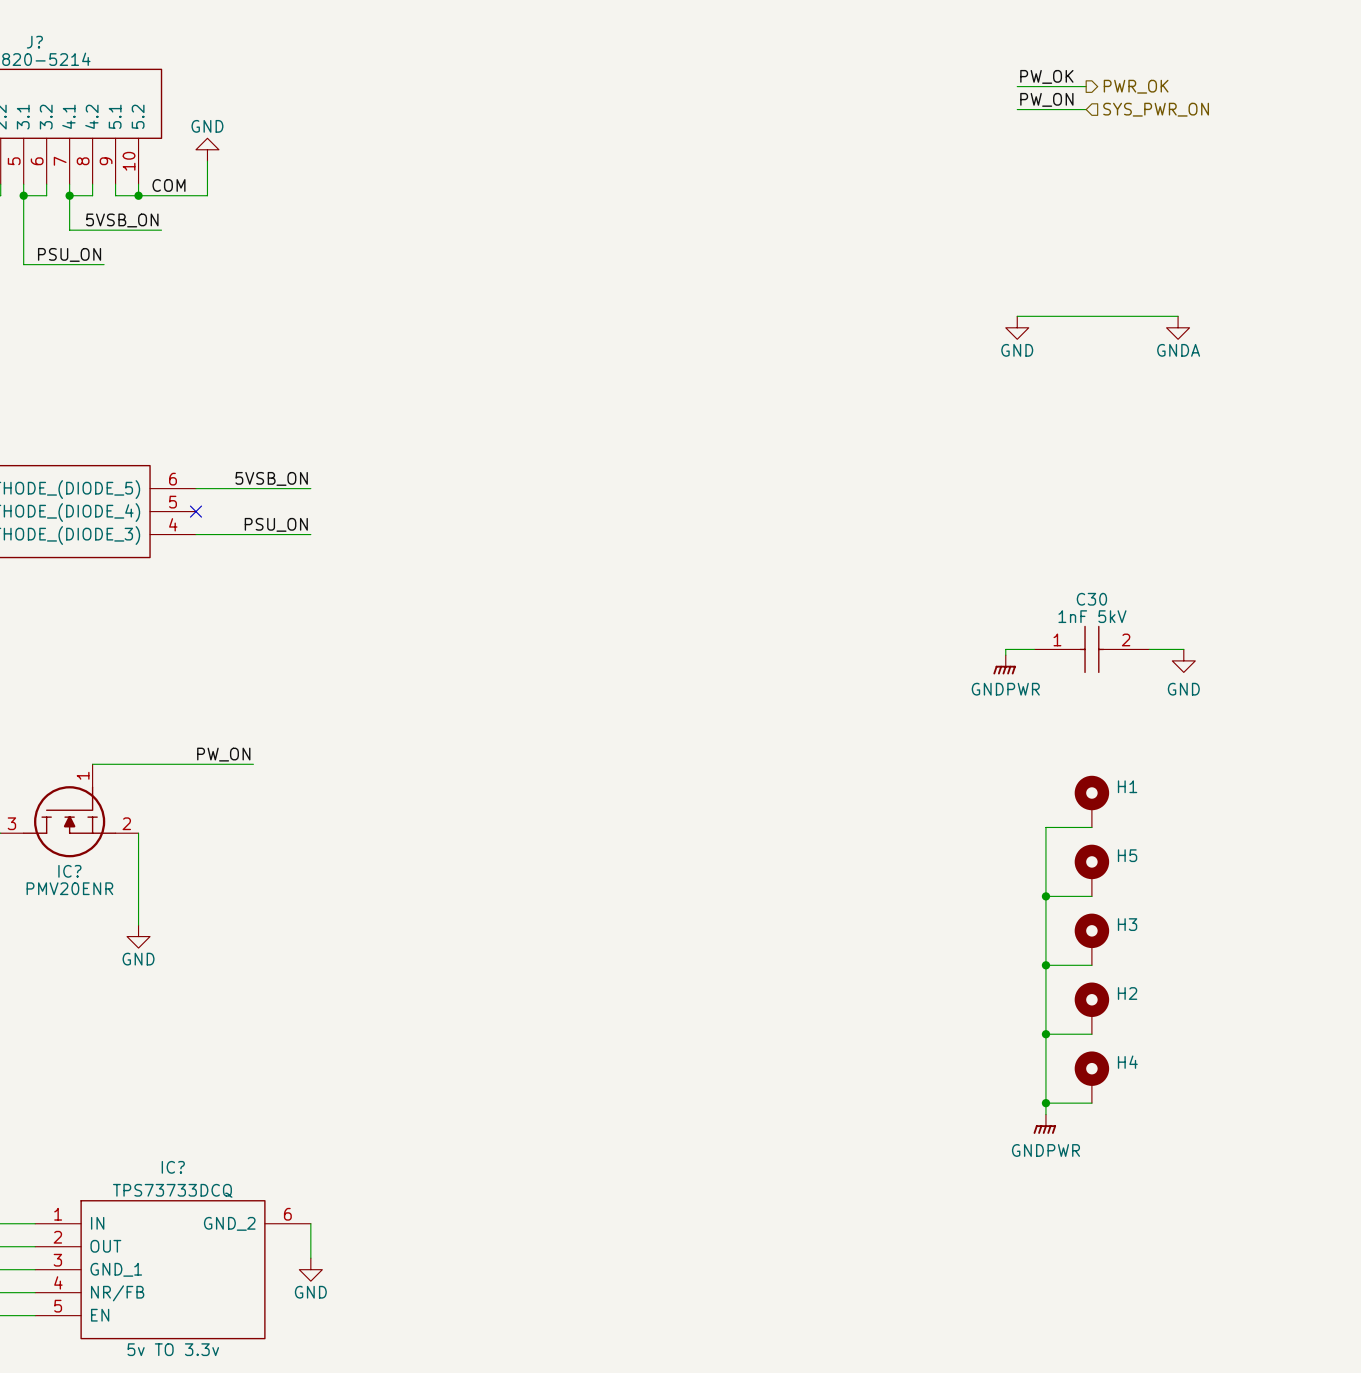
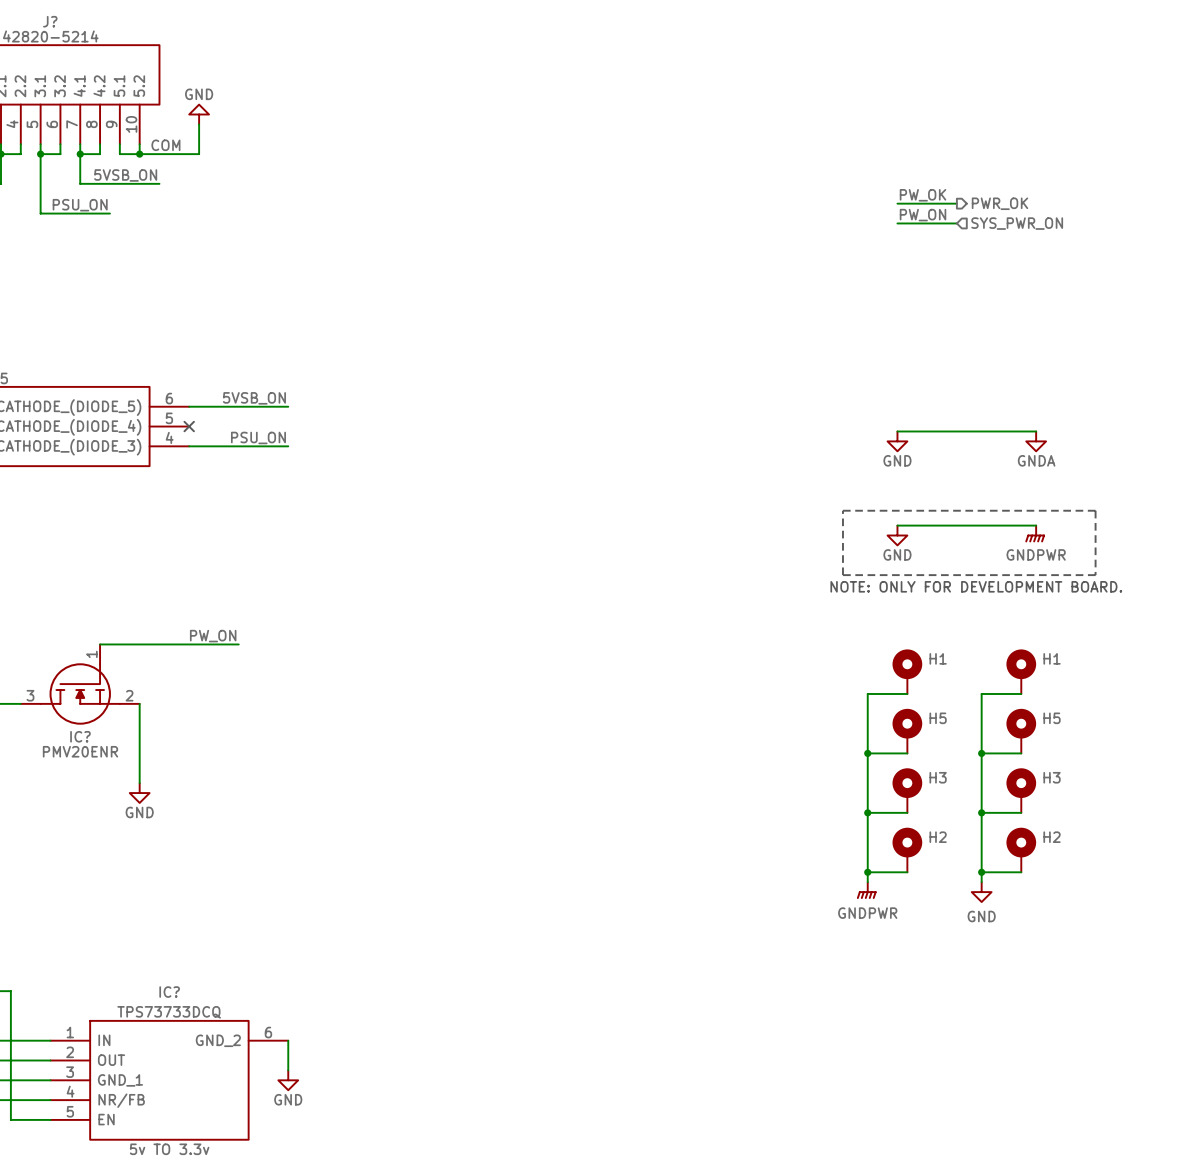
label position: PW_OK (1046, 76) -> PW_OK (923, 195)
wire: (1017, 86) (1086, 86) -> (897, 203) (956, 203)
hierarchical label position: PWR_OK (1136, 86) -> PWR_OK (999, 203)
label position: PW_ON (1046, 99) -> PW_ON (923, 215)
wire: (1017, 109) (1086, 109) -> (897, 223) (956, 223)
hierarchical label position: SYS_PWR_ON (1156, 109) -> SYS_PWR_ON (1017, 223)
wire: (1017, 316) (1178, 316) -> (897, 431) (1036, 431)
power symbol: GND (1017, 327) -> none
power symbol position: GNDA (1178, 327) -> GNDA (1036, 441)
power symbol: none -> GND (897, 441)
line: none -> (842, 510) (1095, 510) (1095, 575) (842, 575) (842, 510)
wire: none -> (897, 525) (1036, 525)
power symbol: none -> GND (897, 535)
wire: (1034, 649) (1005, 649) (1005, 655) -> none
C30: 1nF 5kV (1091, 649) -> none
wire: (1149, 649) (1183, 649) -> none
power symbol: GND (1183, 660) -> none
power symbol position: GNDPWR (1004, 664) -> GNDPWR (1035, 533)
text: none -> NOTE: ONLY FOR DEVELOPMENT BOARD. (976, 586)
H1: none -> (907, 671)
H1: none -> (1021, 671)
H1: (1091, 801) -> none
wire: none -> (907, 693) (867, 693) (867, 882)
wire: none -> (1021, 693) (981, 693) (981, 882)
wire: (1091, 827) (1045, 827) (1045, 1114) -> none
H5: none -> (907, 731)
H5: none -> (1021, 731)
H5: (1091, 870) -> none
junction: none -> (867, 753)
wire: none -> (981, 753) (1021, 753)
junction: none -> (981, 753)
wire: (1045, 896) (1091, 896) -> (867, 753) (907, 753)
junction: (1045, 896) -> none
H3: none -> (907, 790)
H3: none -> (1021, 790)
H3: (1091, 939) -> none
junction: none -> (867, 812)
wire: none -> (981, 812) (1021, 812)
junction: none -> (981, 812)
wire: (1045, 965) (1091, 965) -> (867, 812) (907, 812)
junction: (1045, 965) -> none
H2: none -> (907, 850)
H2: none -> (1021, 850)
H2: (1091, 1008) -> none
junction: none -> (867, 872)
junction: none -> (981, 872)
wire: (1045, 1034) (1091, 1034) -> (867, 872) (907, 872)
junction: (1045, 1034) -> none
power symbol: none -> GND (981, 892)
H4: (1091, 1077) -> none
wire: (1045, 1103) (1091, 1103) -> (981, 872) (1021, 872)
junction: (1045, 1103) -> none
power symbol position: GNDPWR (1044, 1124) -> GNDPWR (866, 890)

